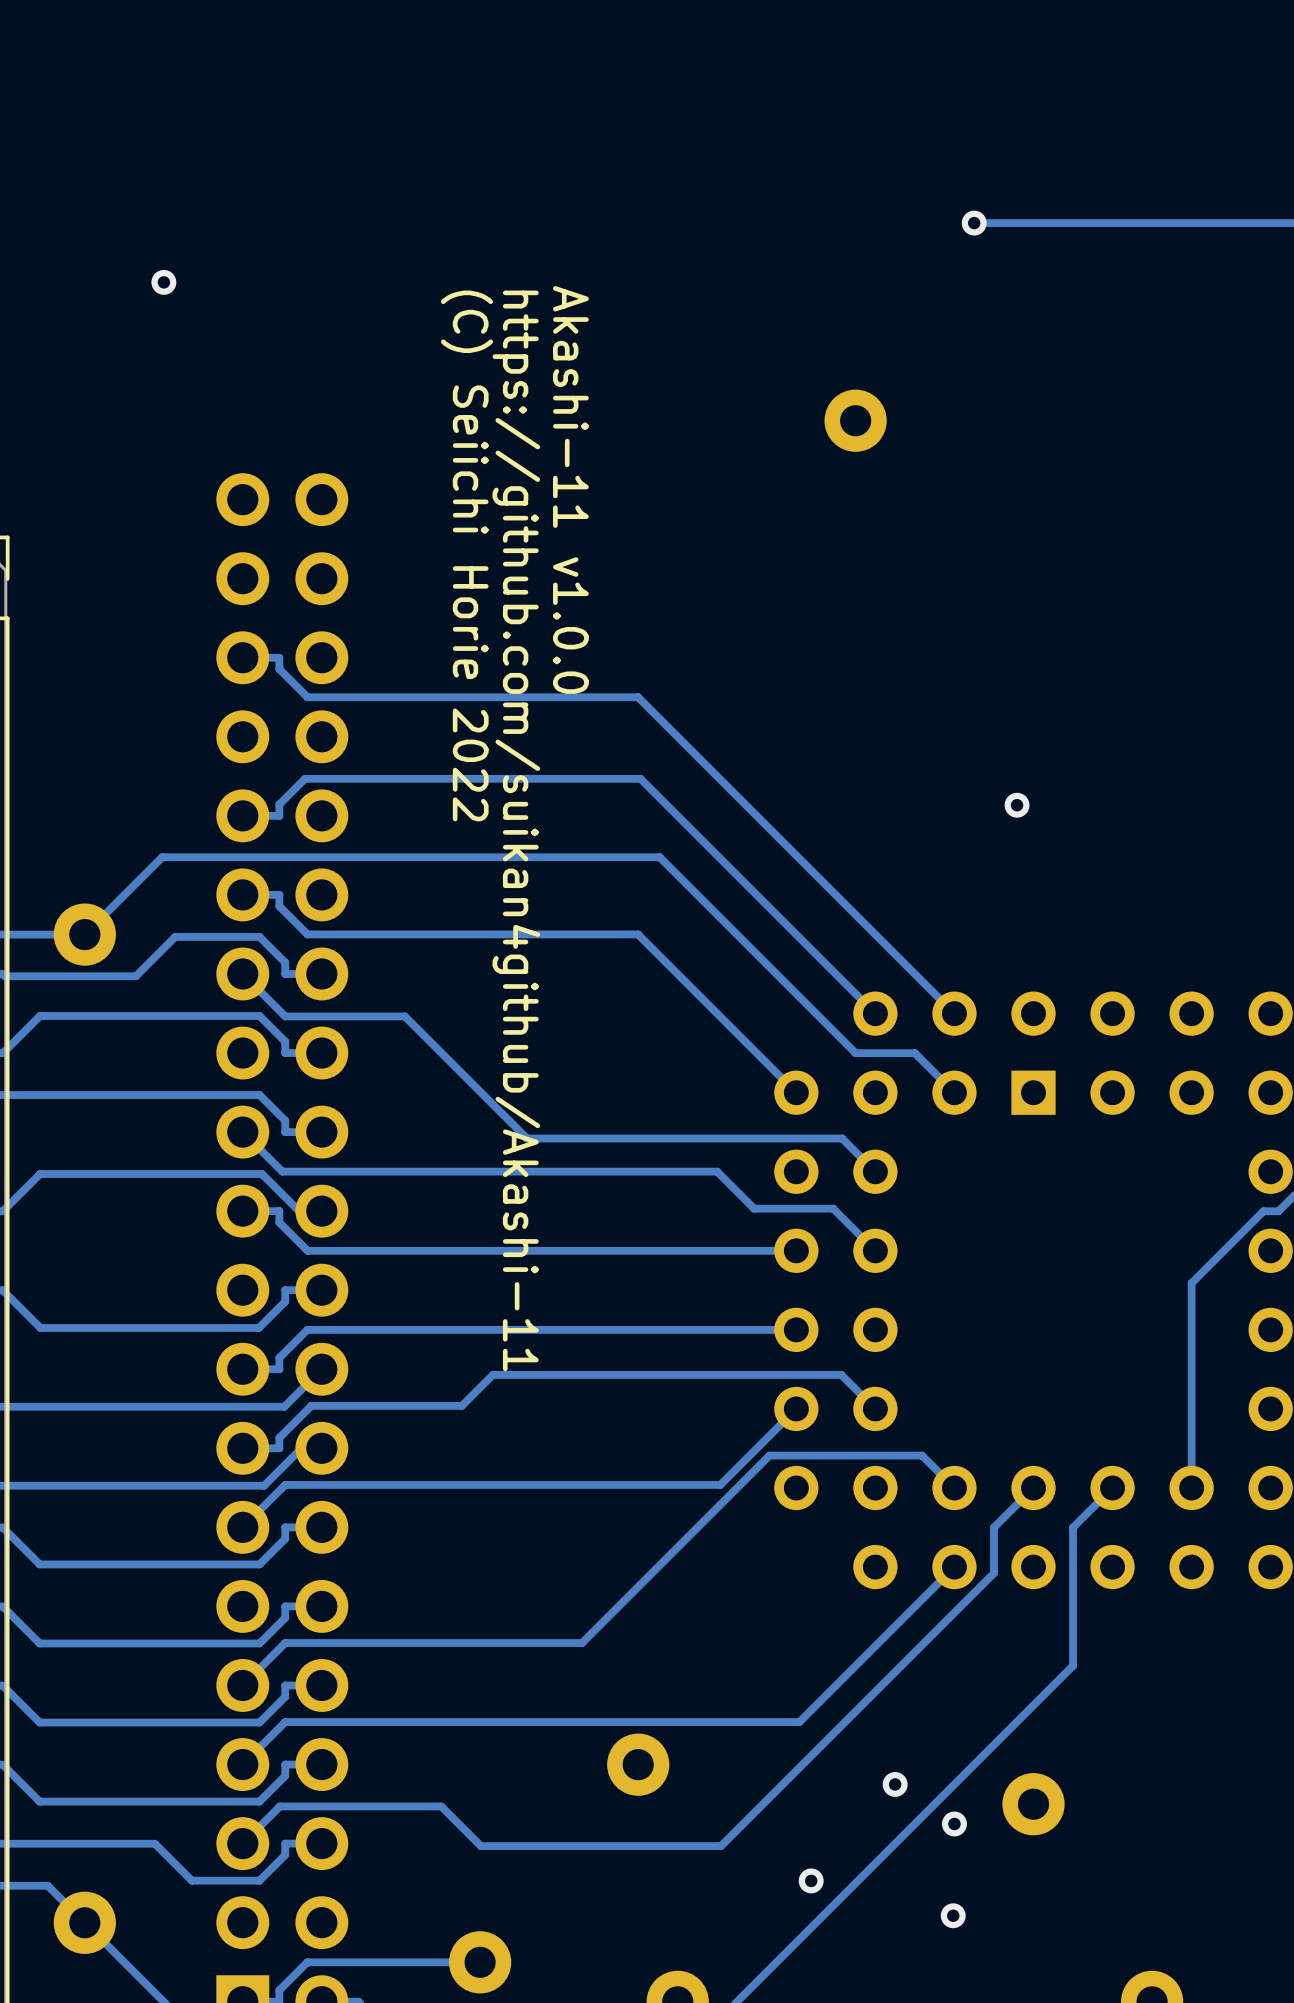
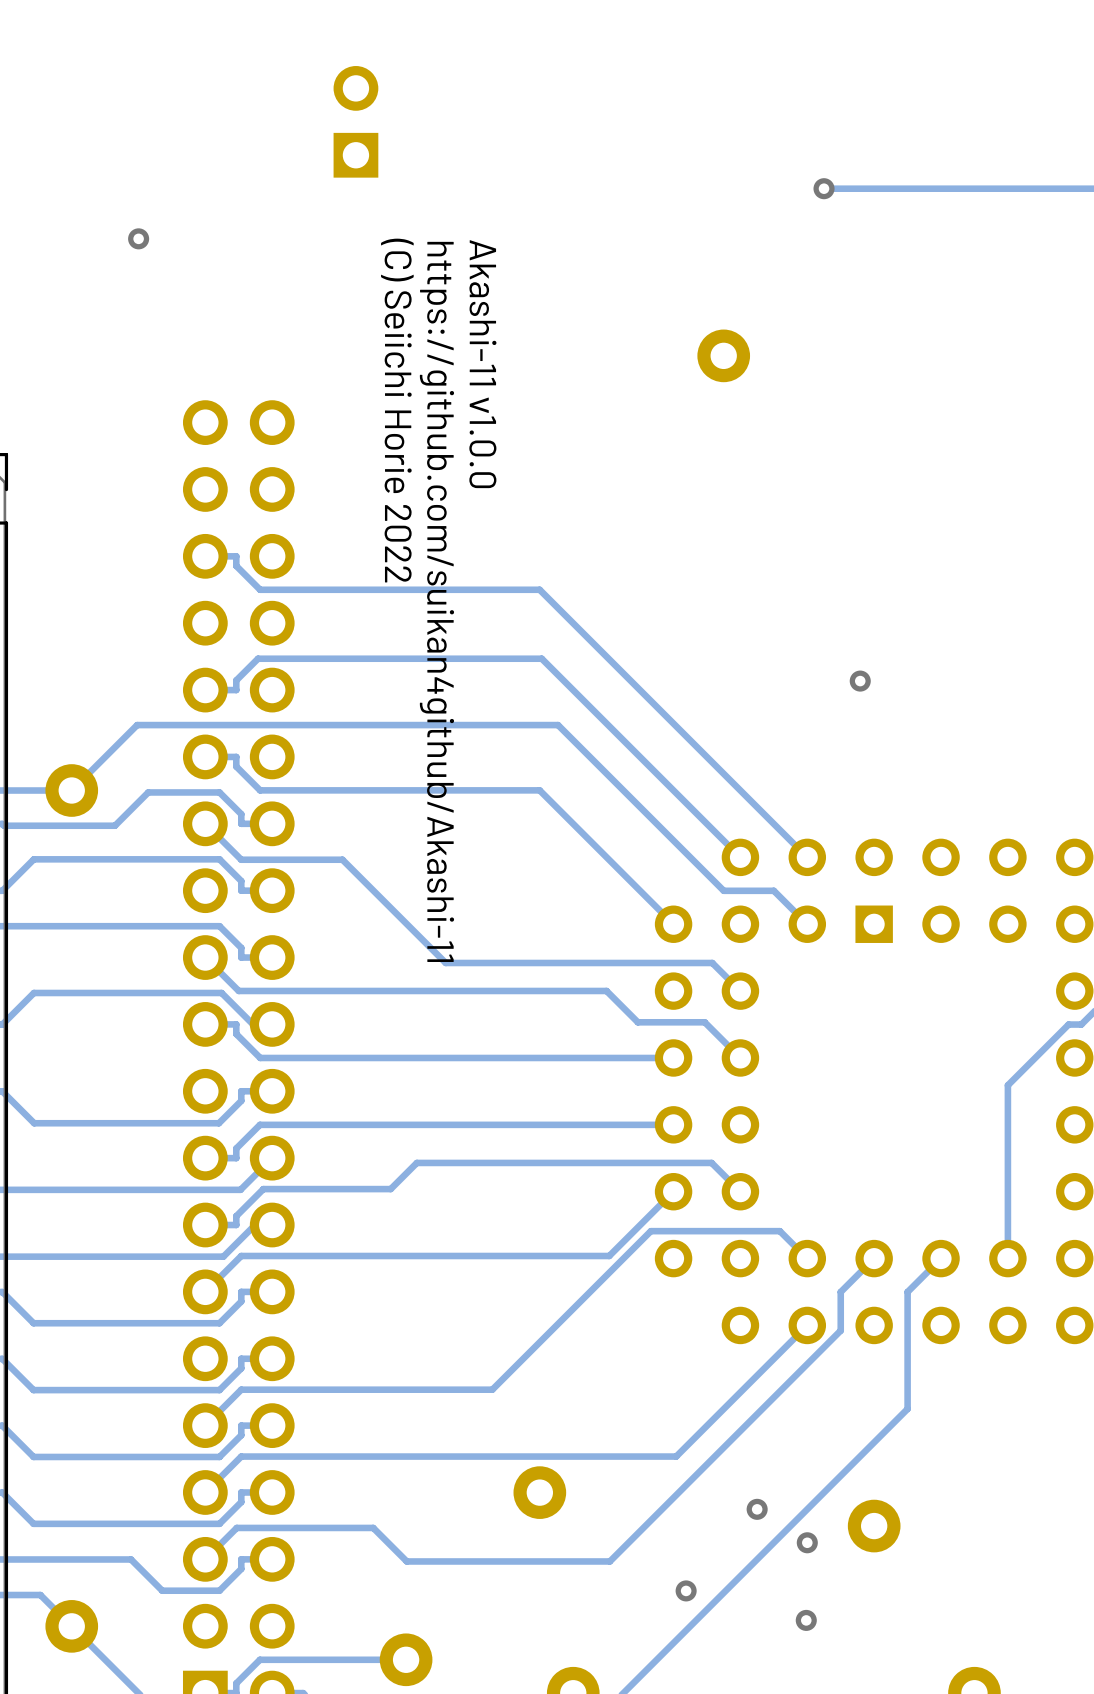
part: none -> (355, 121)

